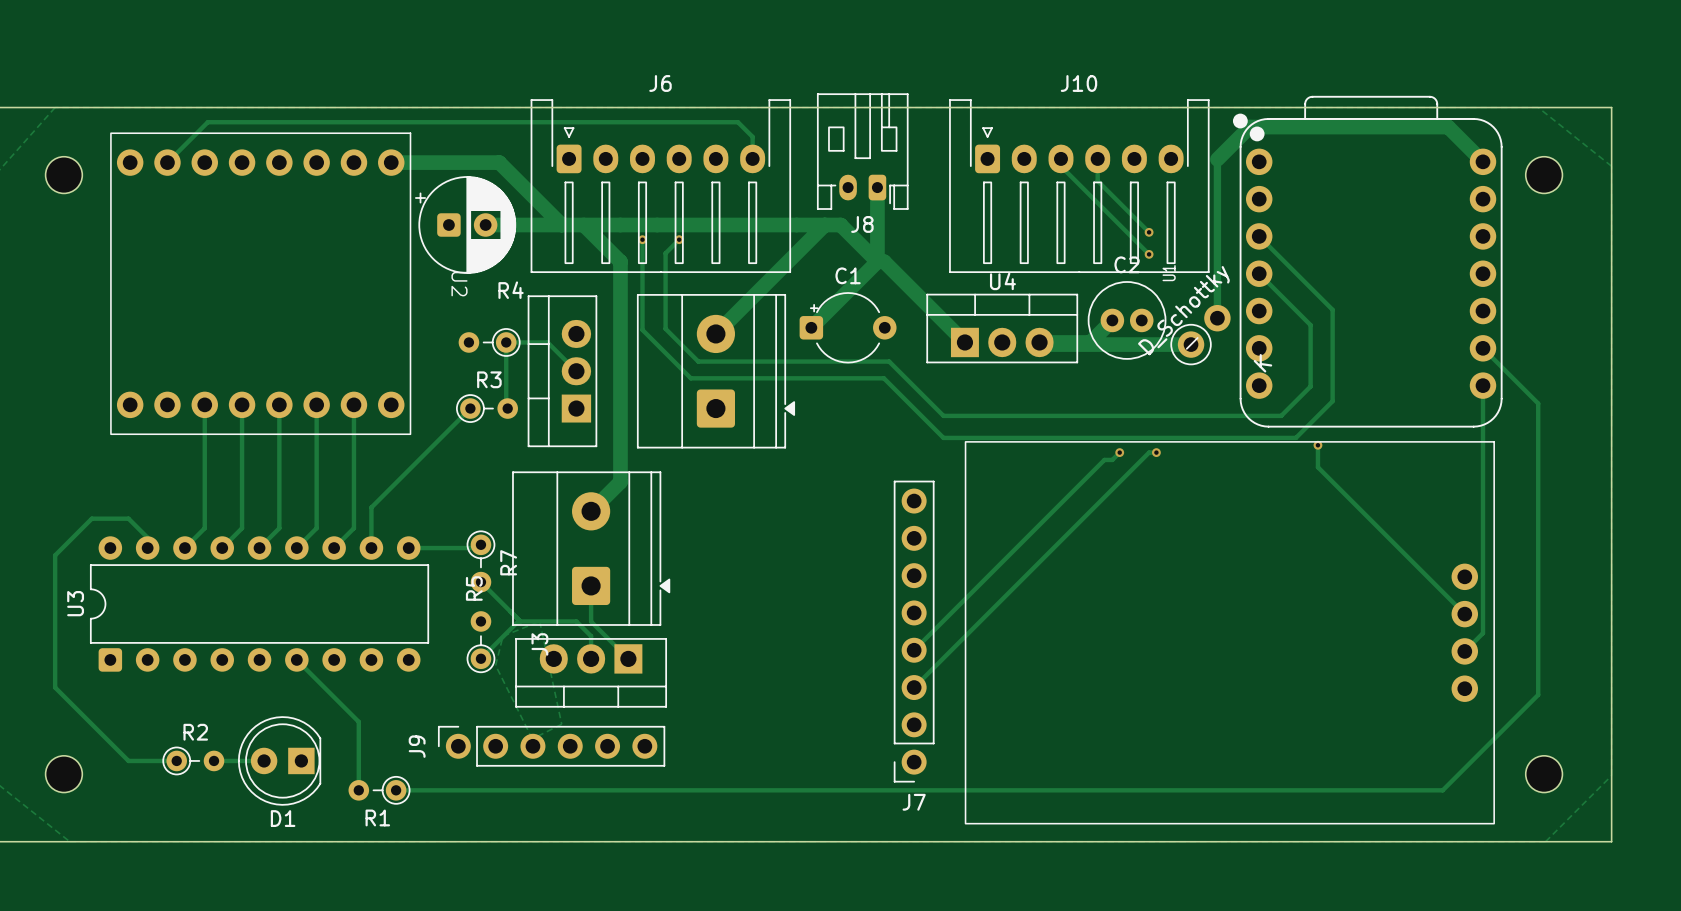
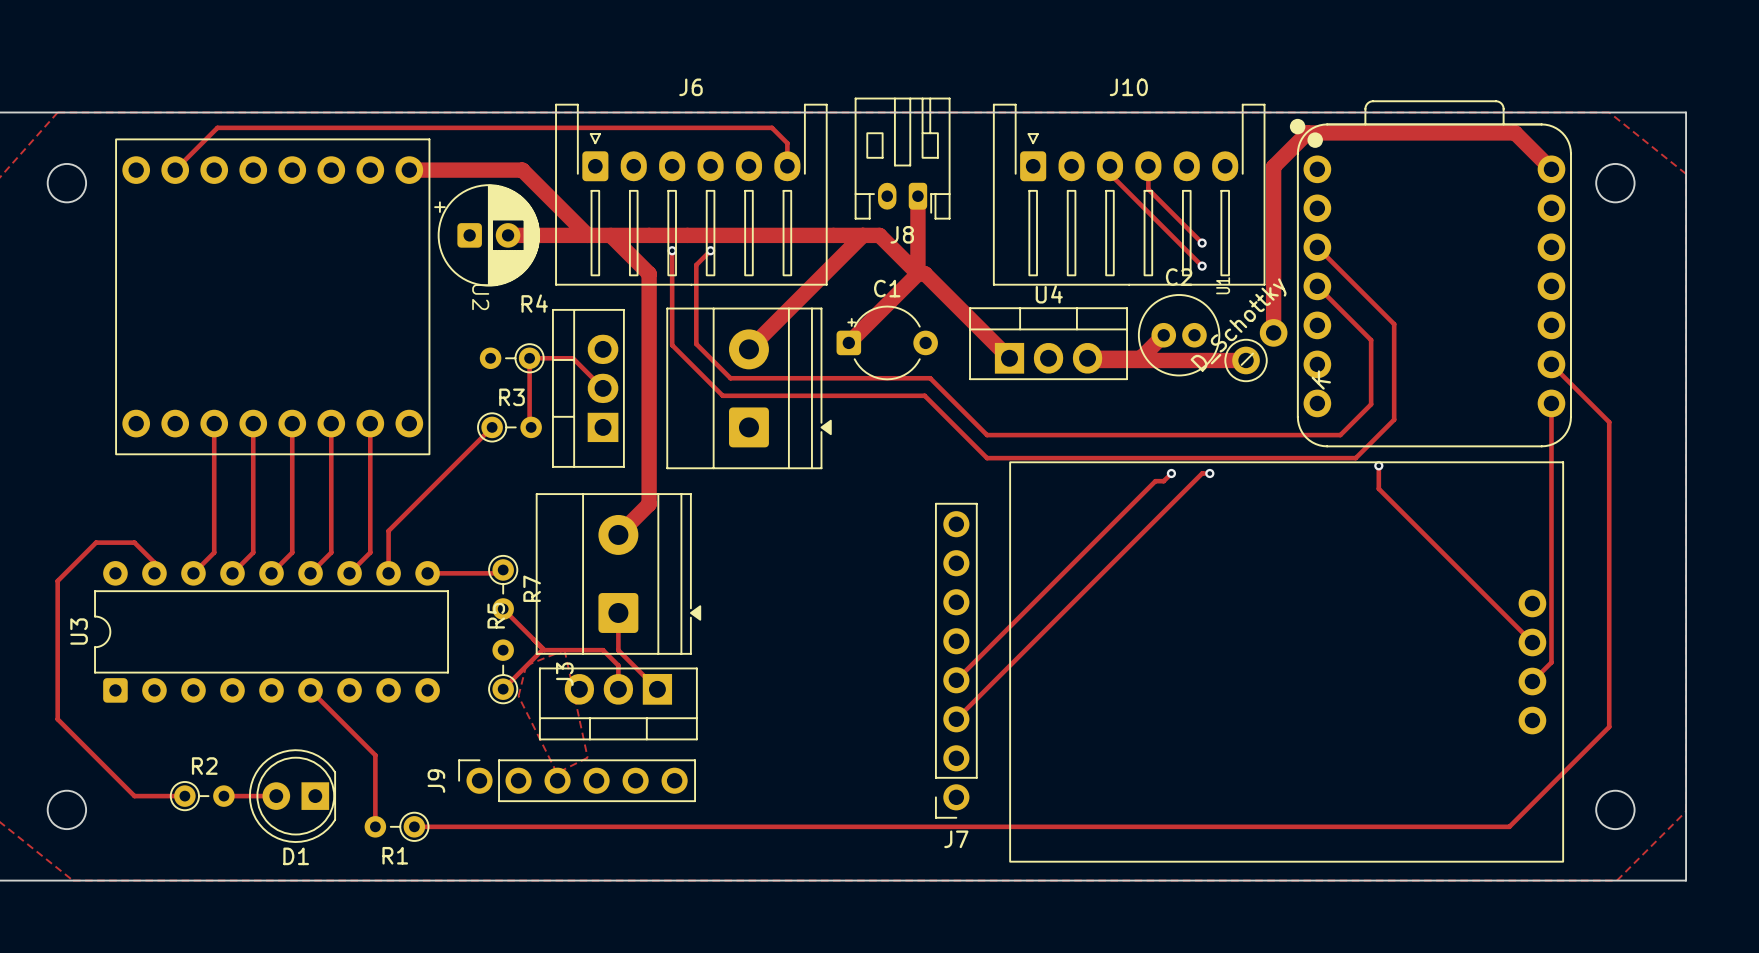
track width: thin (1217, 159) (1217, 318) -> thick (1273, 166) (1273, 332)

